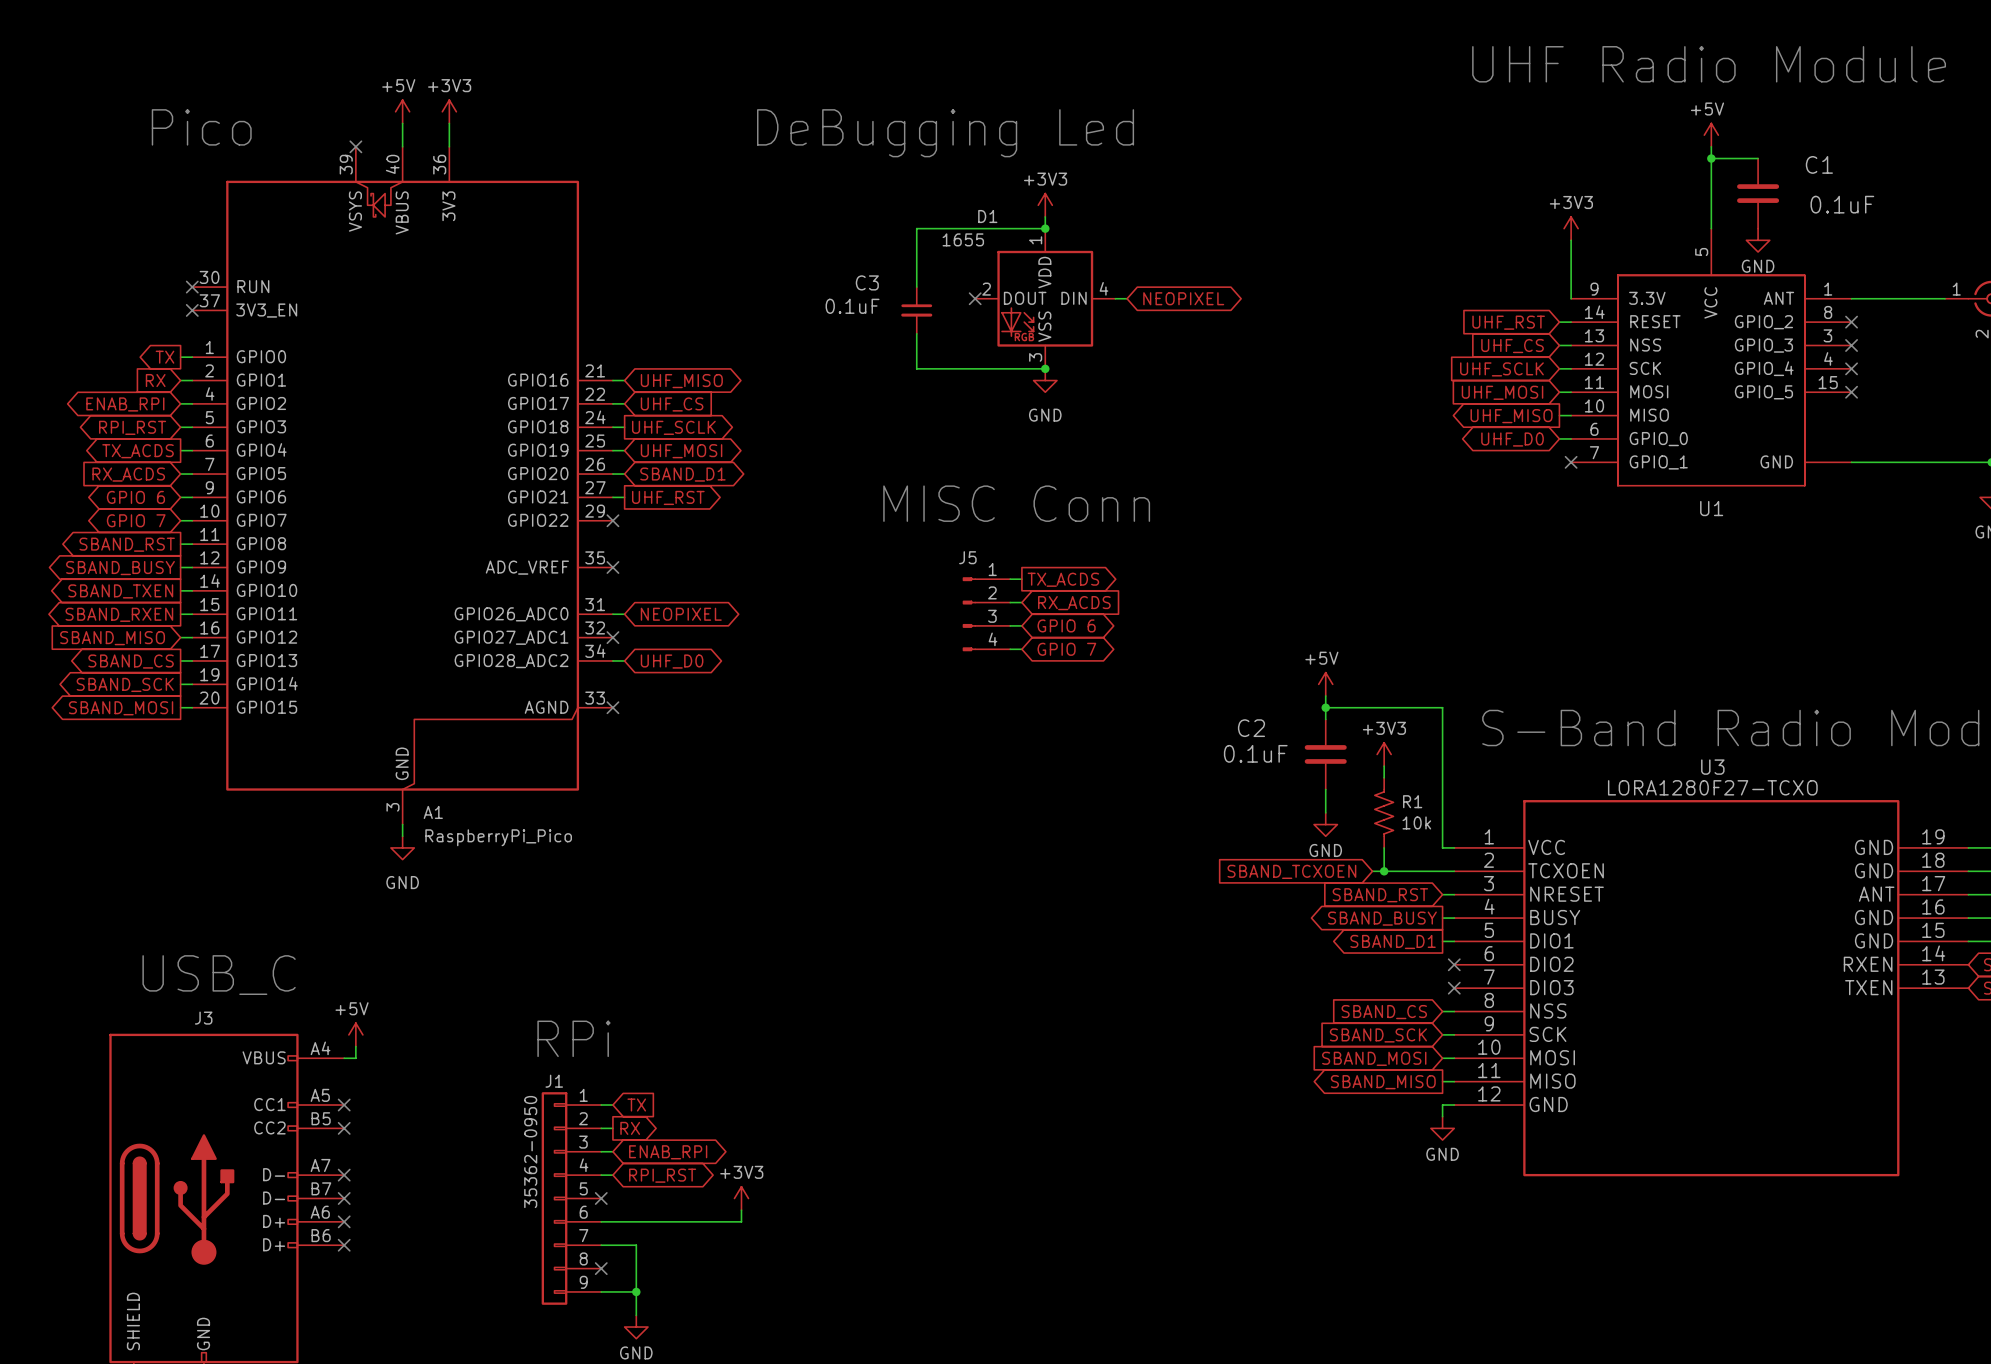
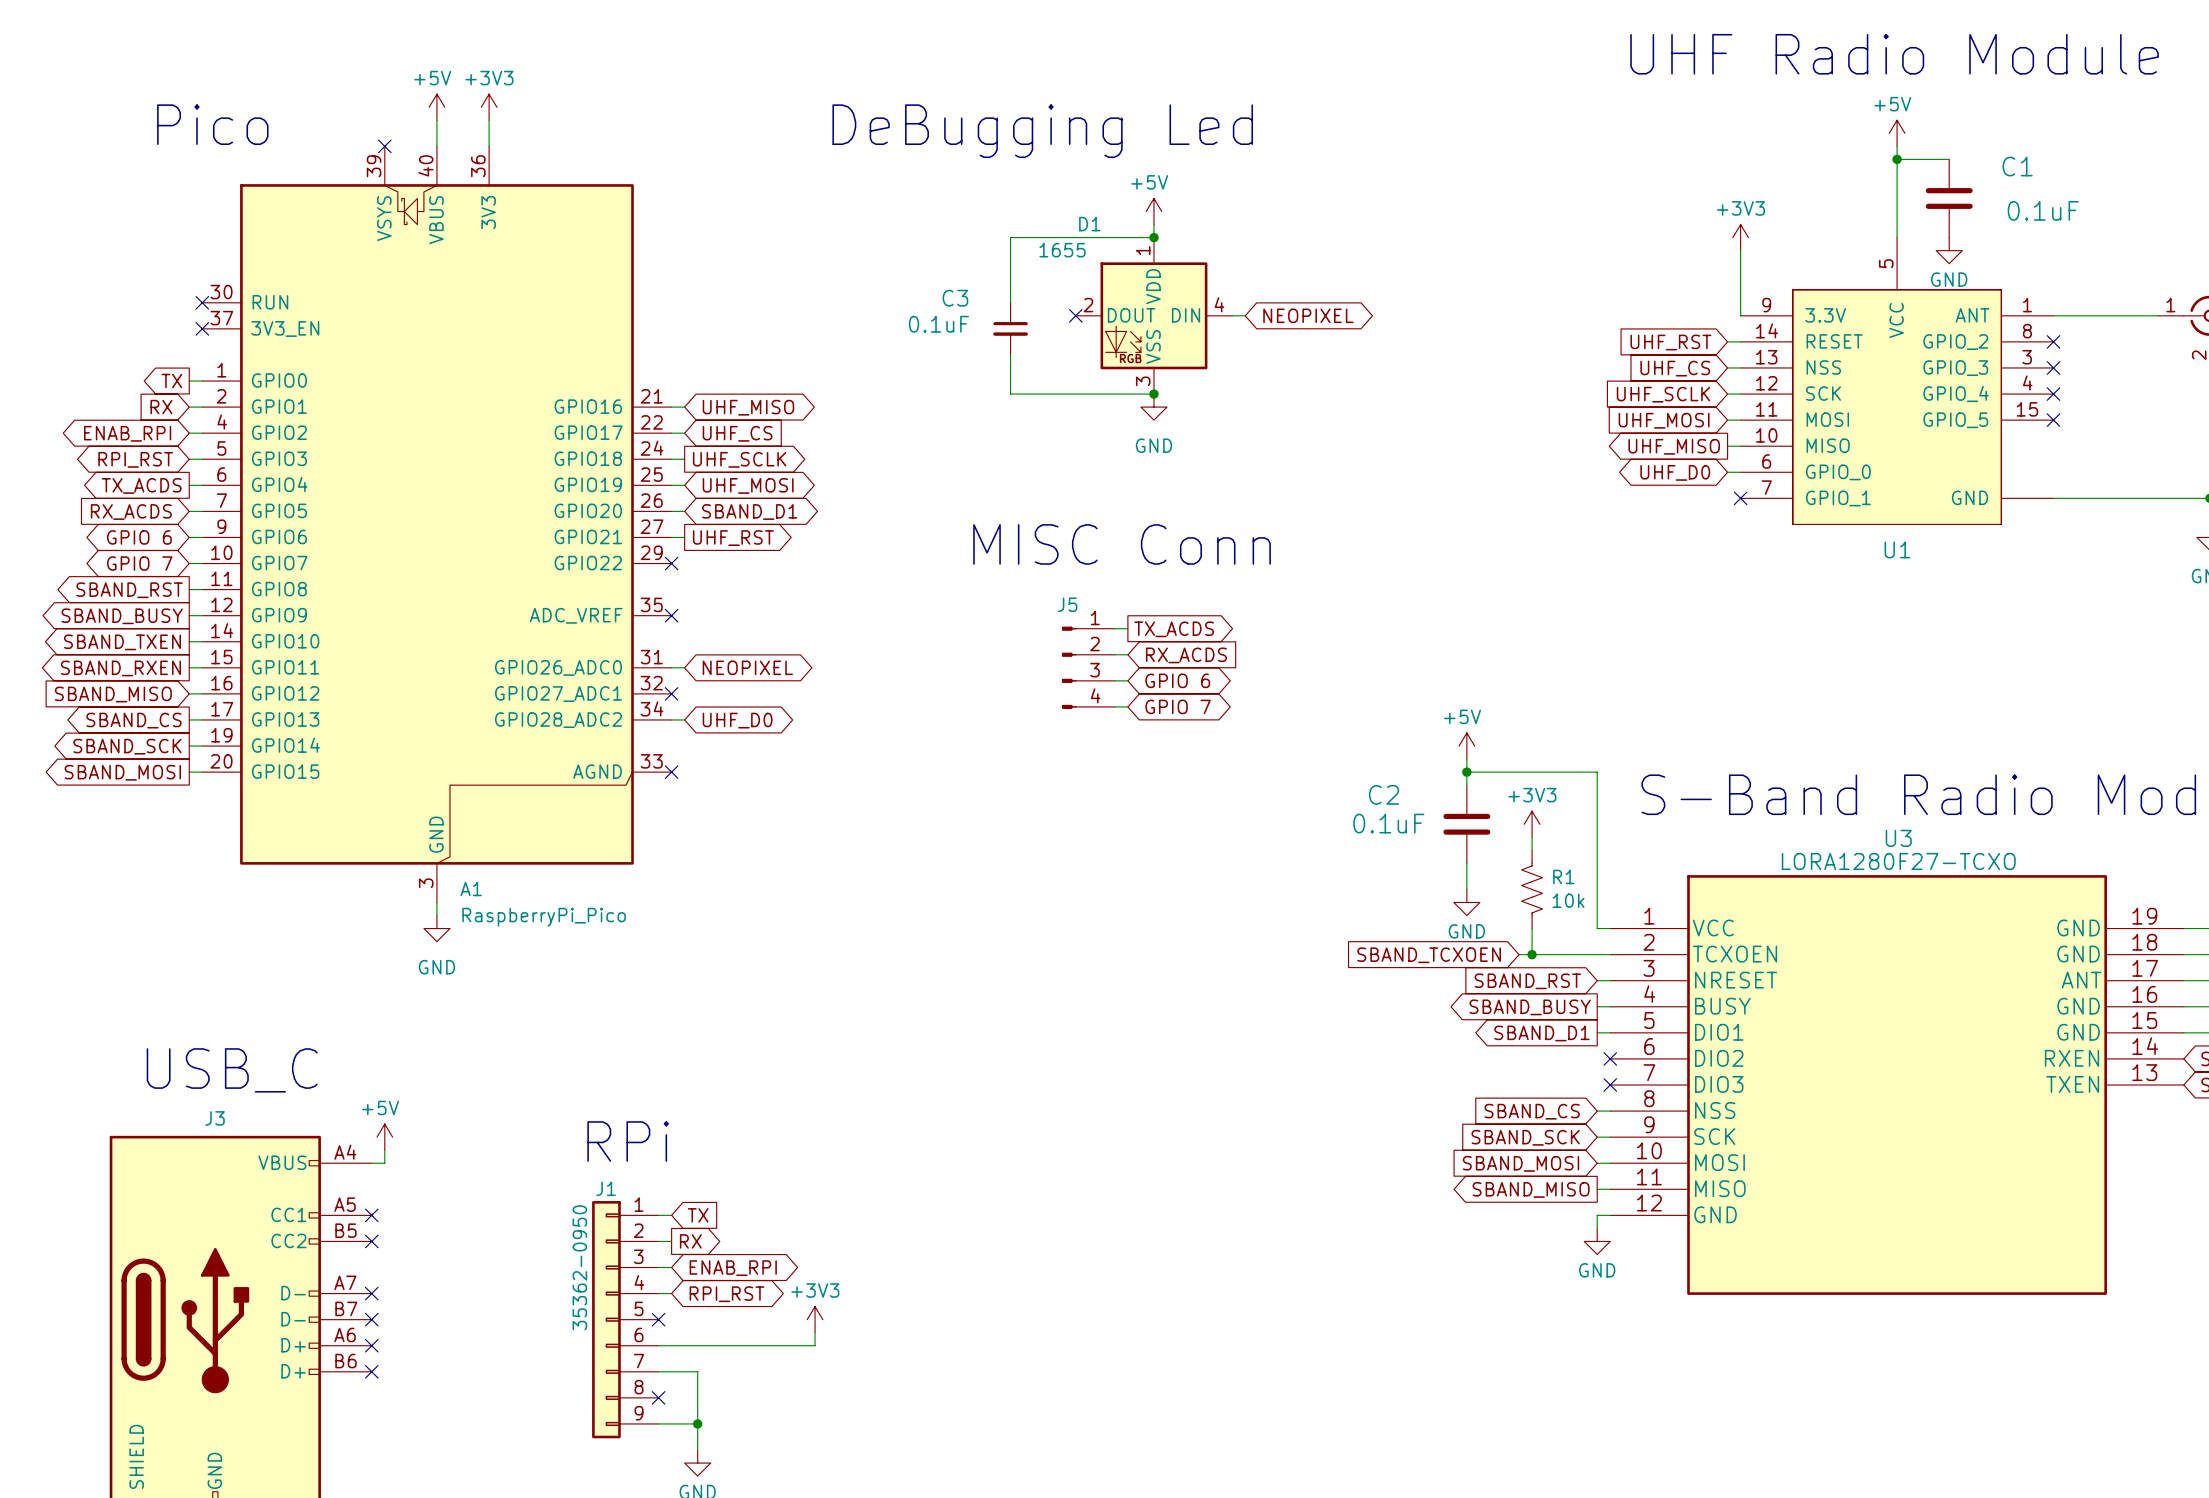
power symbol: +3V3 (1045, 205) -> +5V (1153, 211)

